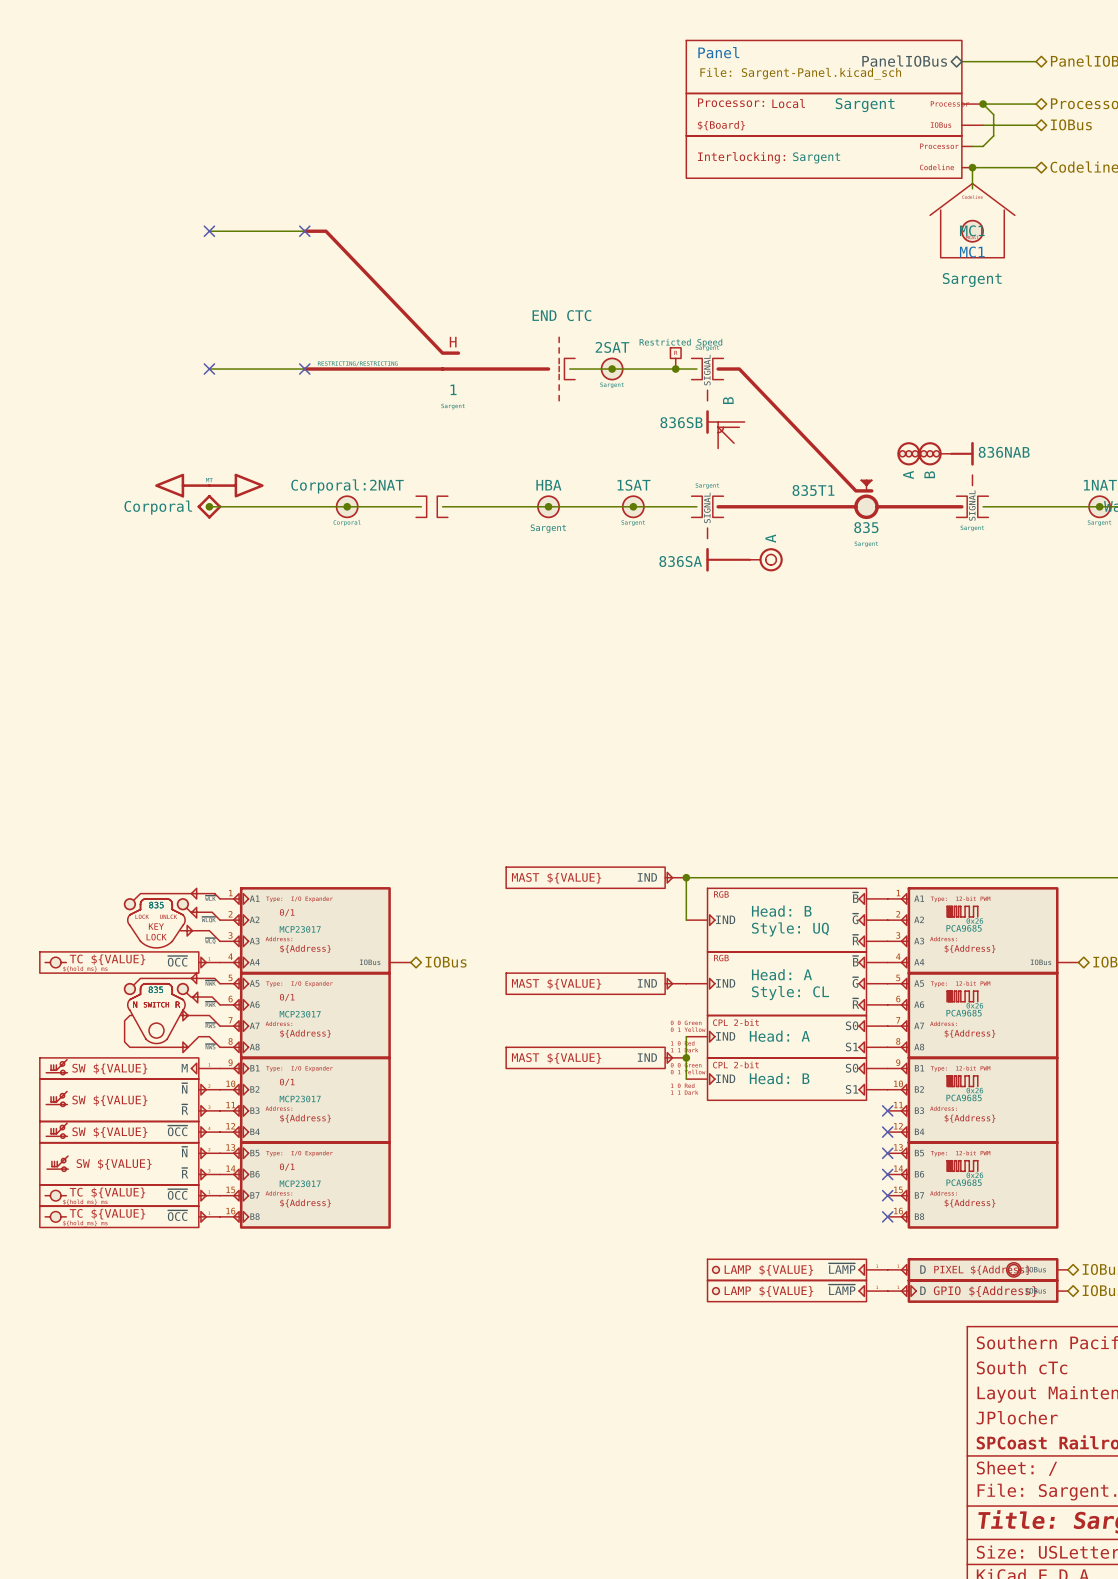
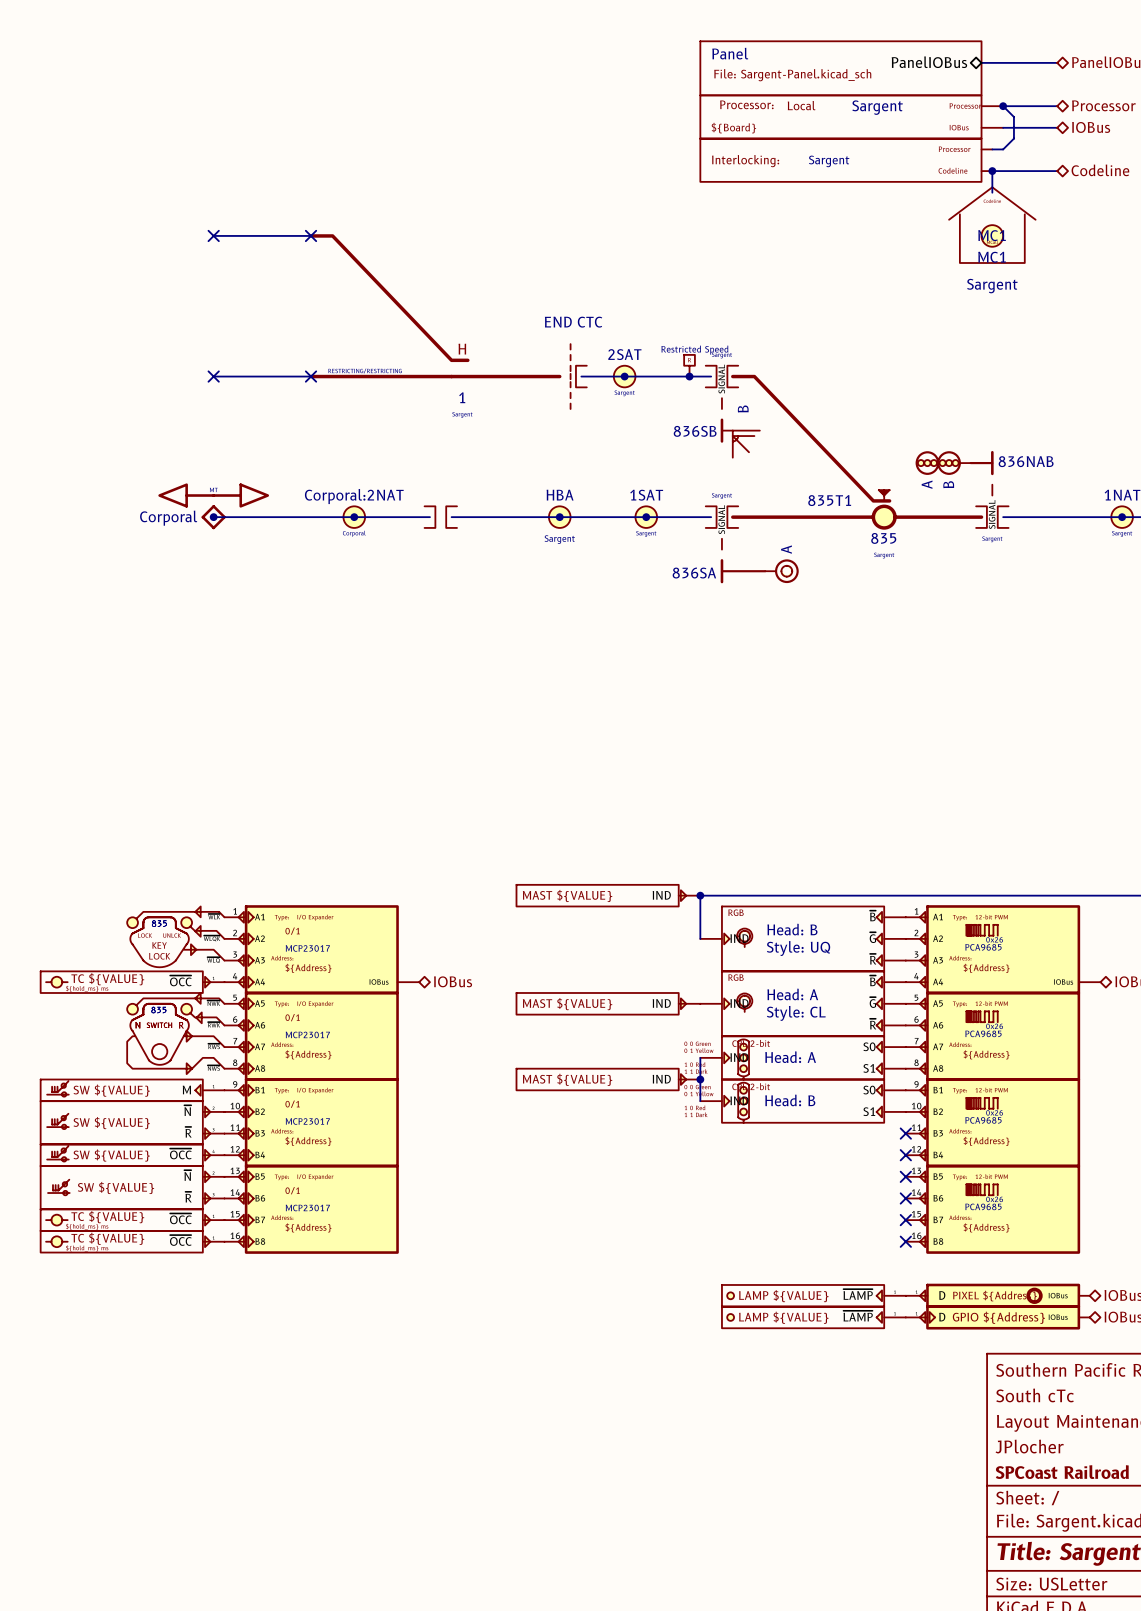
part symbol: [686, 888, 888, 952] -> [700, 906, 906, 972]
part symbol: [686, 951, 888, 1016] -> [700, 971, 906, 1037]
part symbol: [686, 1015, 888, 1058] -> [700, 1036, 906, 1080]
part symbol: [686, 1057, 888, 1101] -> [700, 1079, 906, 1123]

